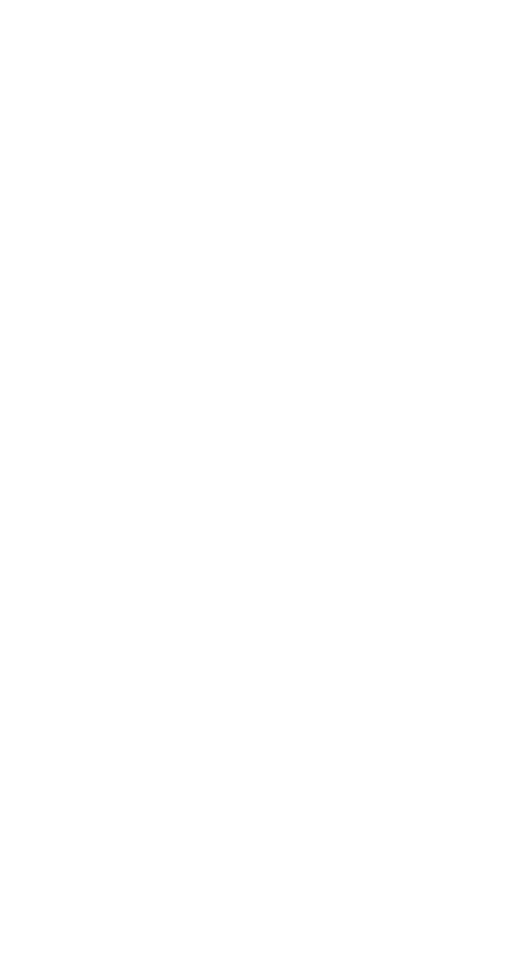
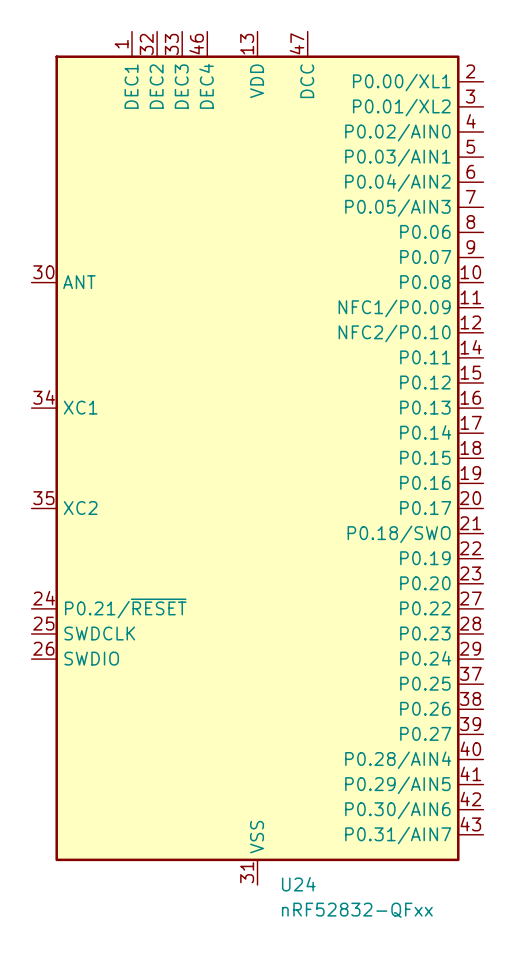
U24: none -> nRF52832-QFxx (257, 458)

